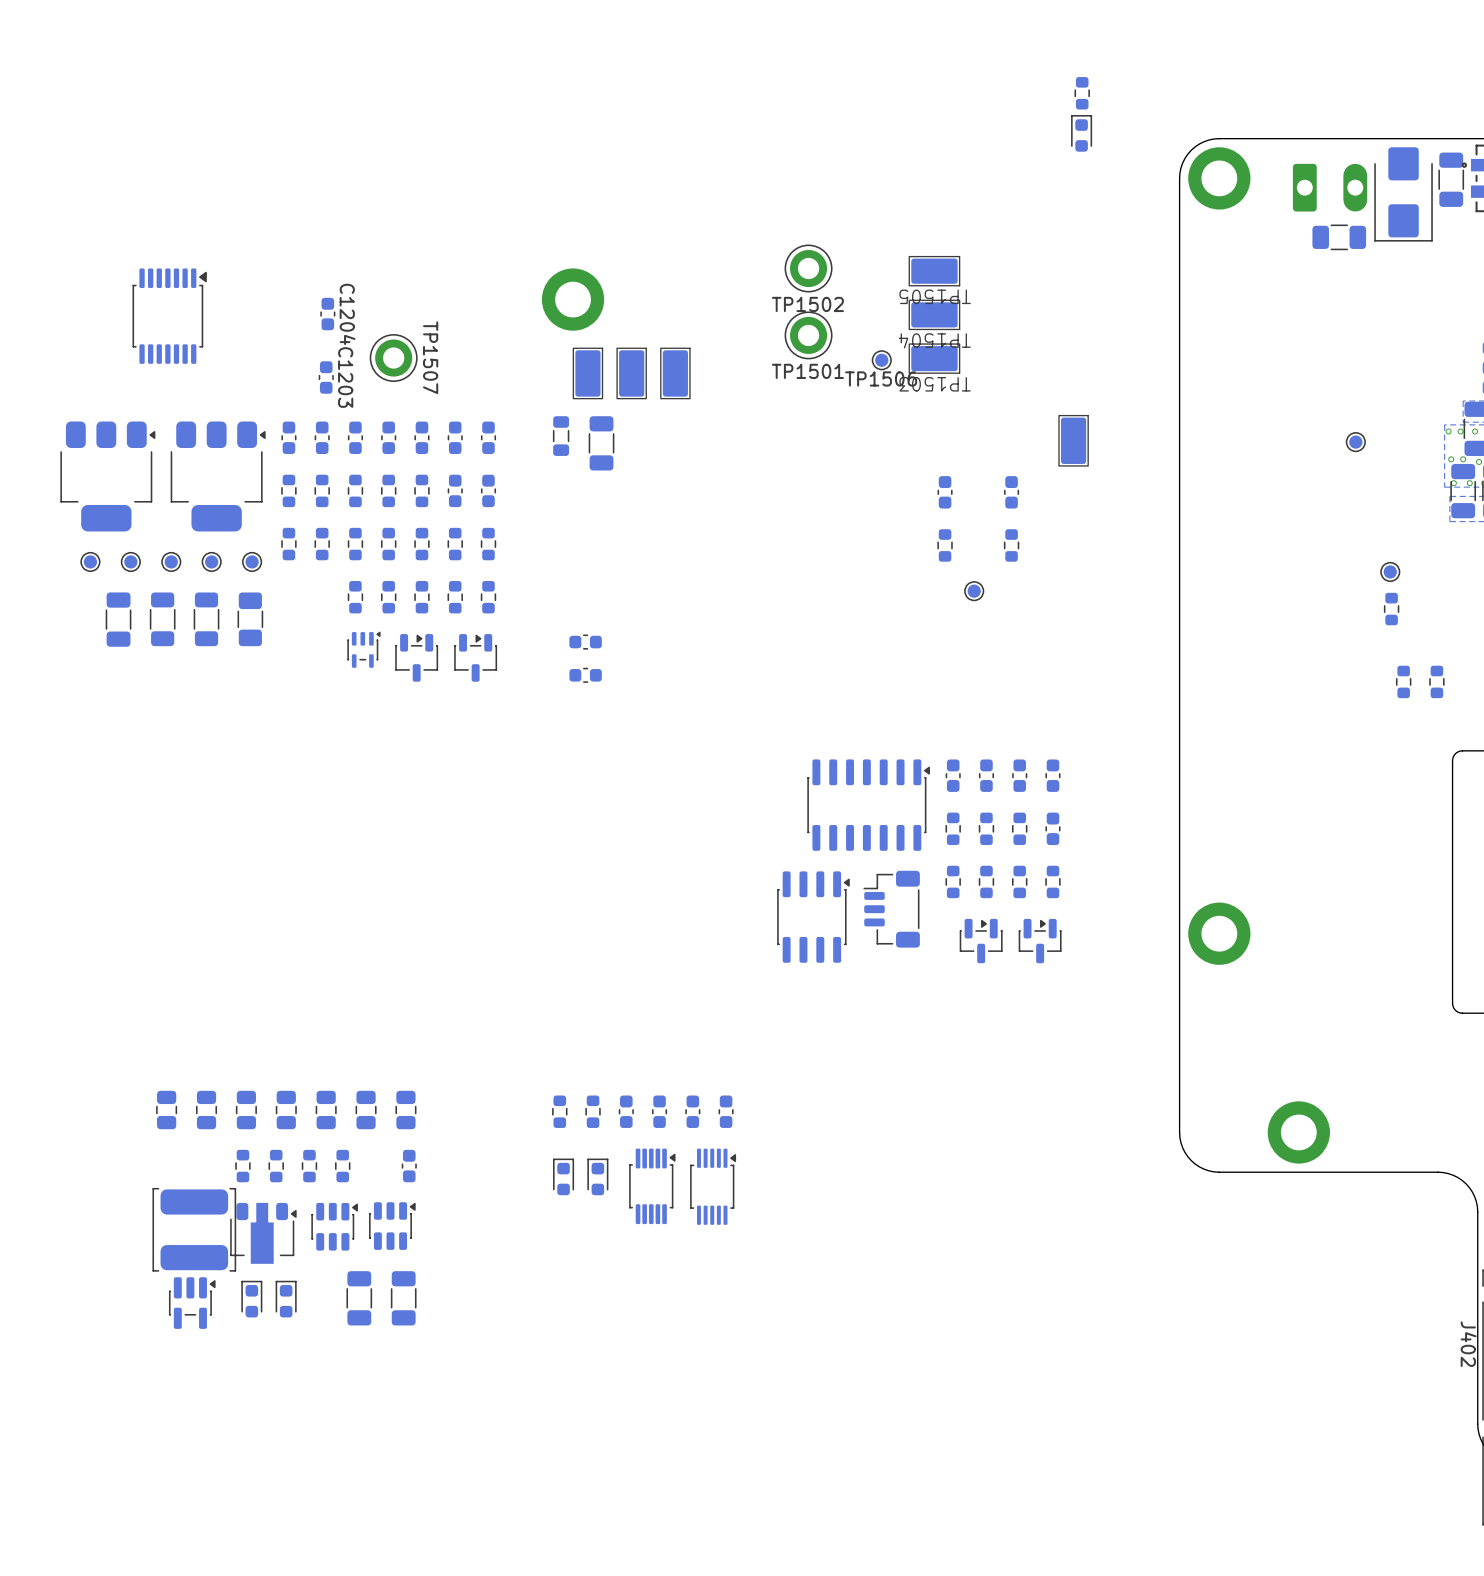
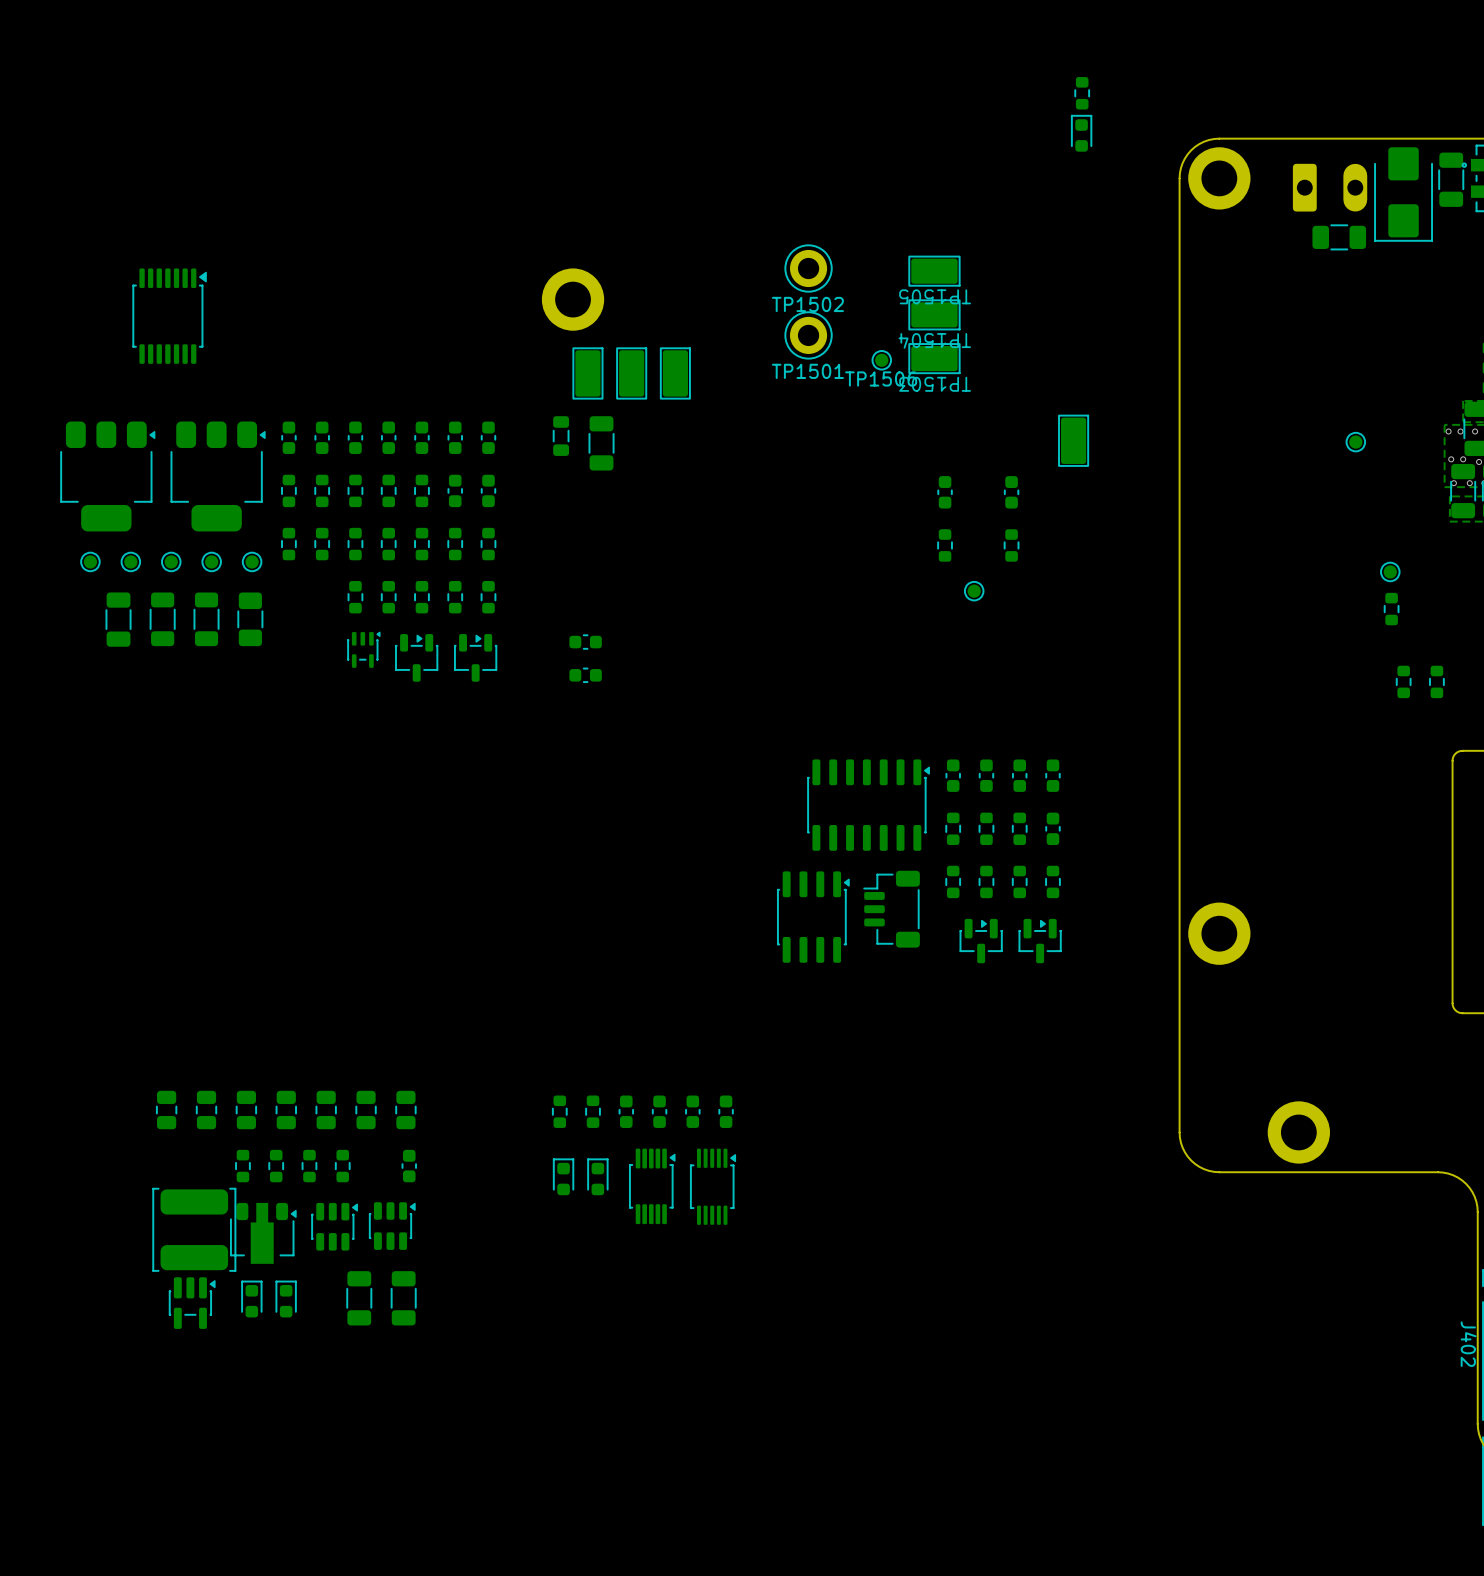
C1204: (327, 314) -> none
TP1507: (393, 358) -> none
C1203: (326, 377) -> none

